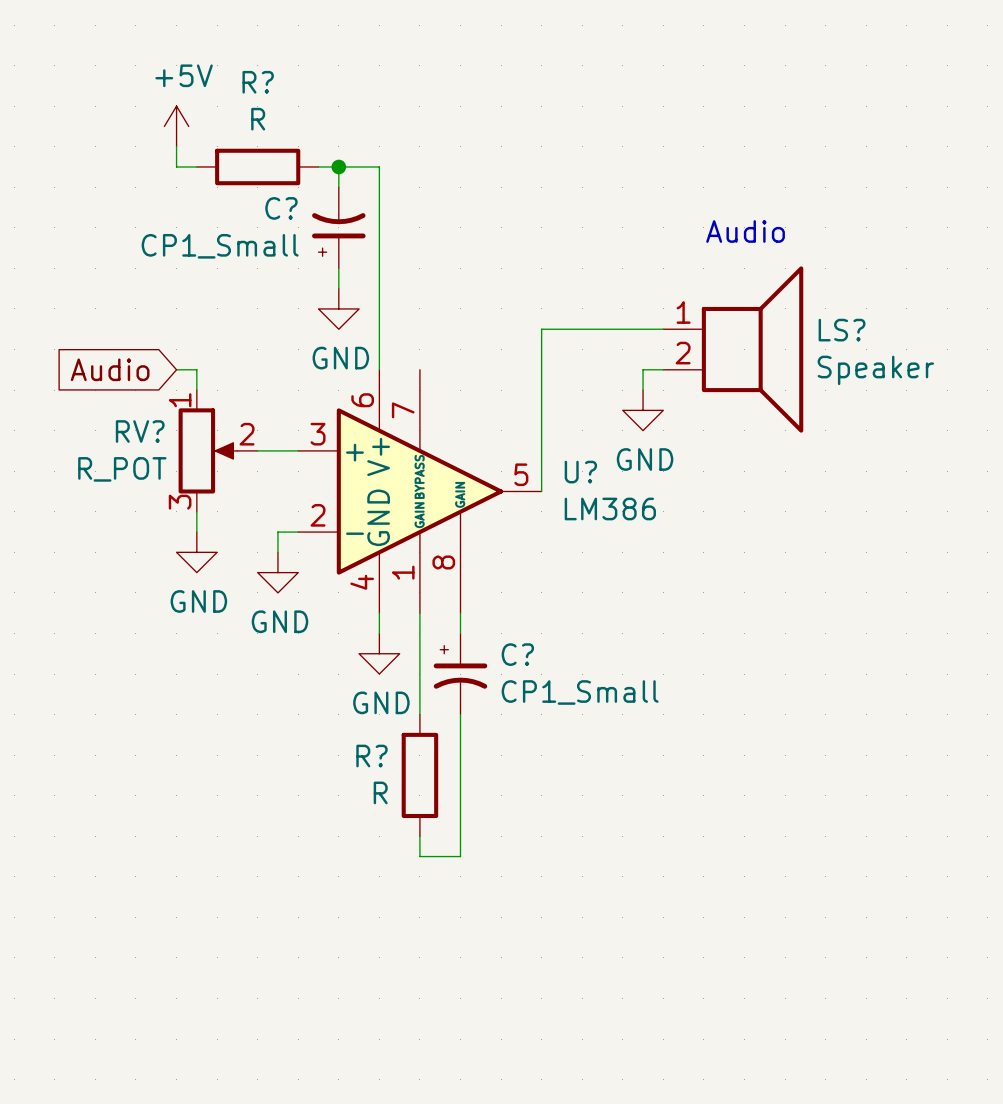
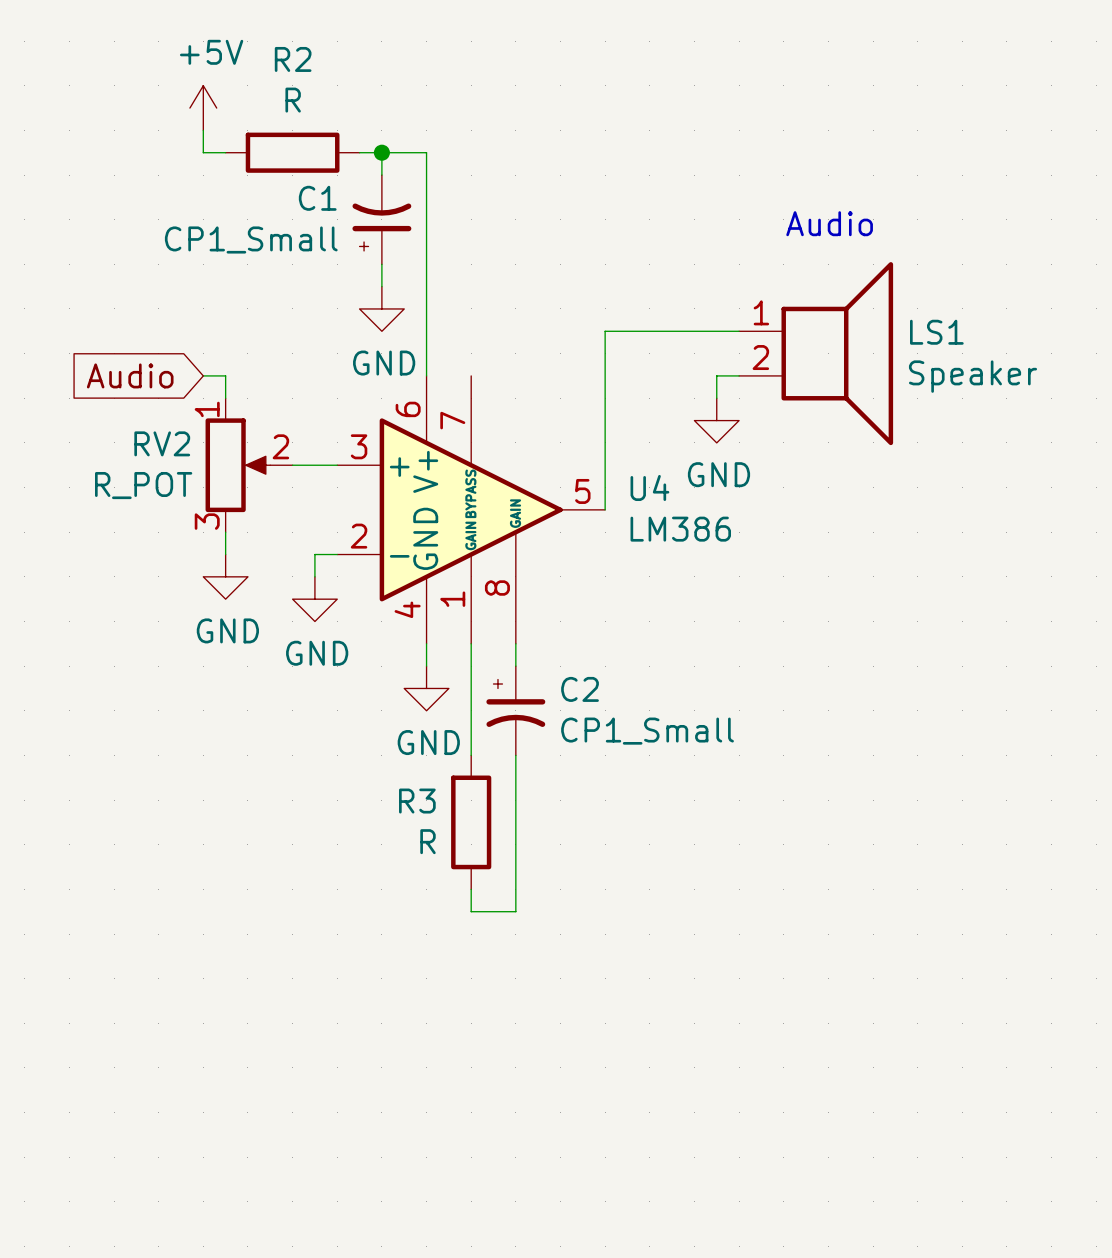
R? name: R? (258, 82) -> R2 (293, 59)
C? name: C? (281, 208) -> C1 (317, 198)
LS? name: LS? (842, 330) -> LS1 (936, 332)
RV? name: RV? (140, 431) -> RV2 (162, 443)
U? name: U? (580, 472) -> U4 (649, 487)
C? name: C? (517, 654) -> C2 (580, 689)
R? name: R? (371, 756) -> R3 (417, 801)

